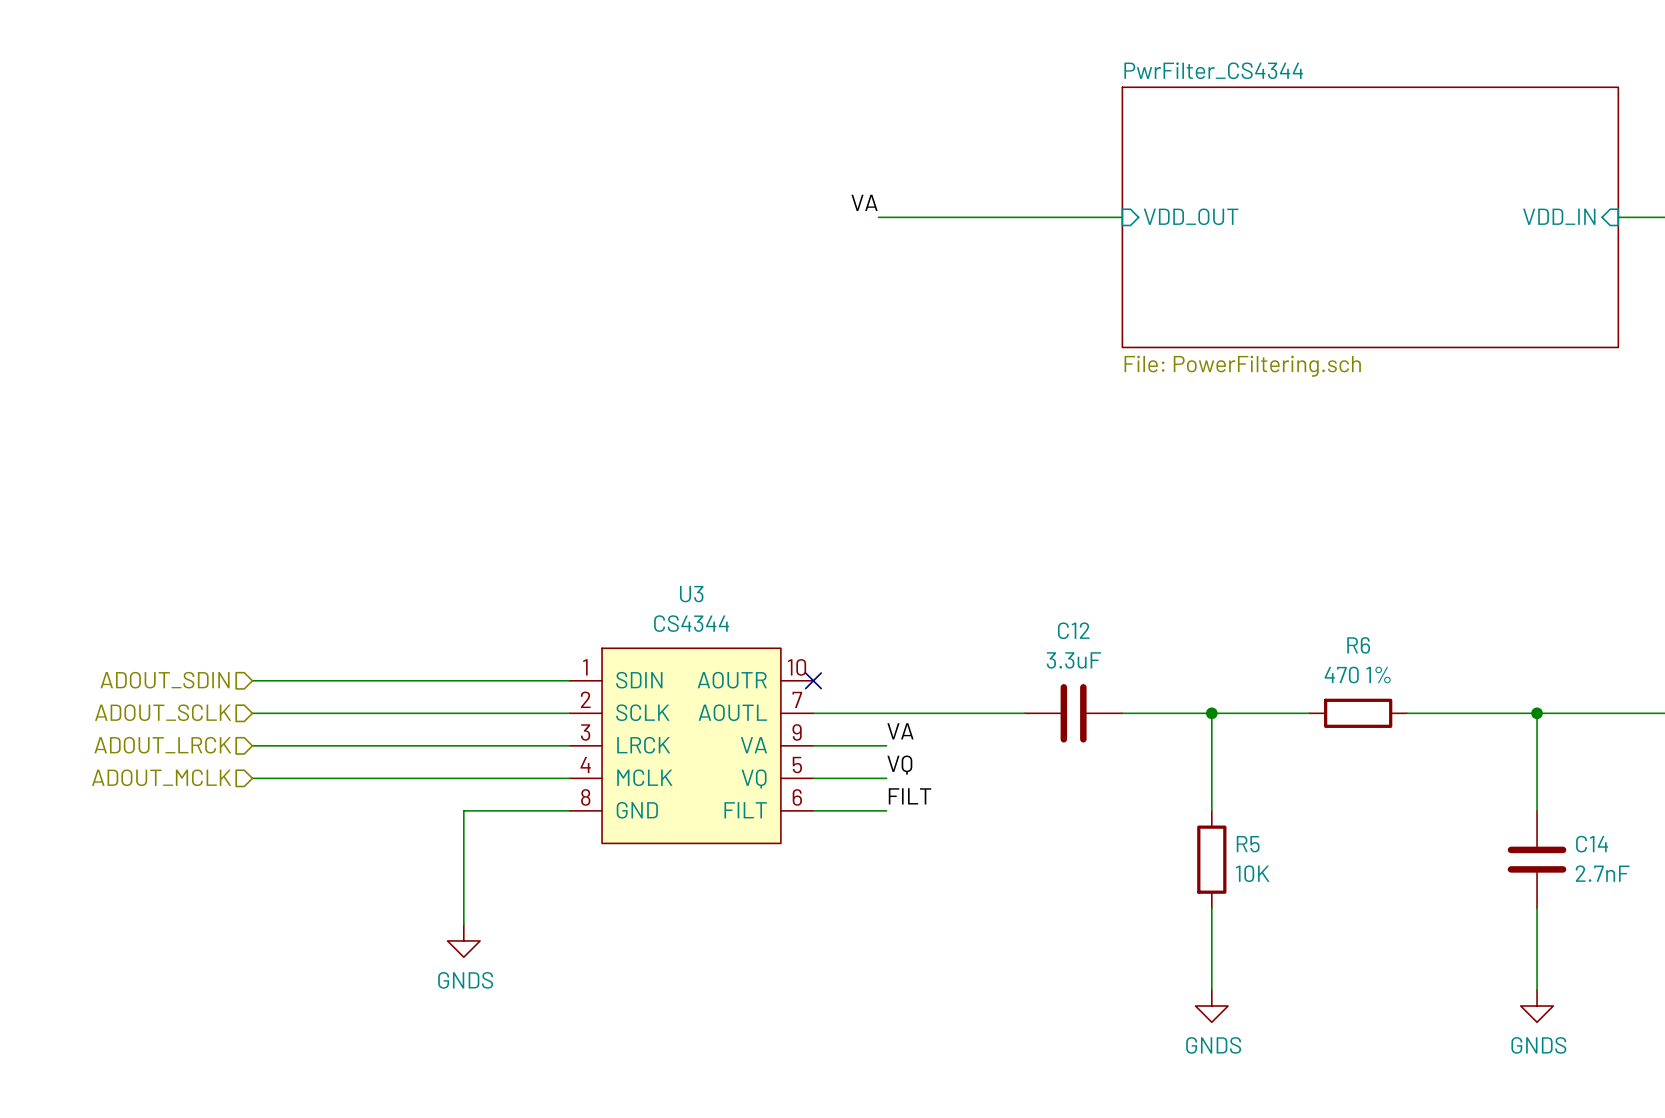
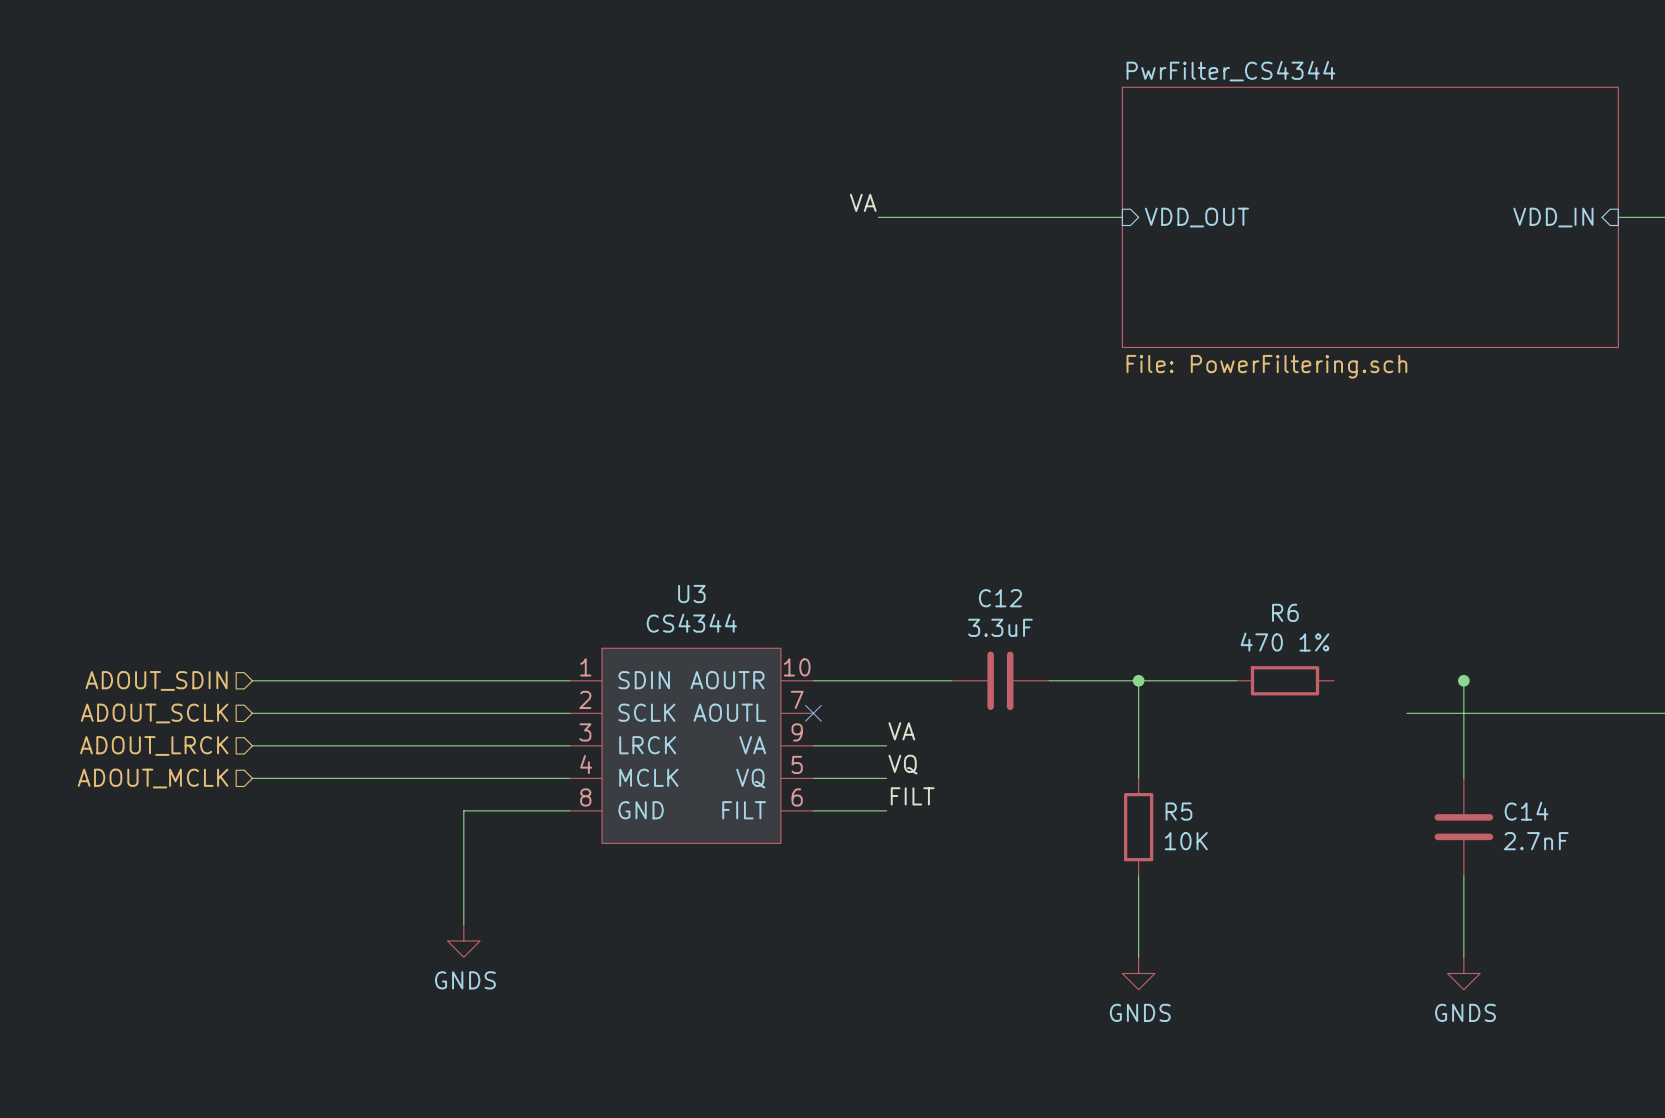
wire: none -> (813, 680) (951, 680)
no-connect mark position: (813, 680) -> (813, 713)
junction: none -> (1138, 680)
junction: none -> (1463, 680)
wire: (813, 713) (1024, 713) -> none
C12 position: (1073, 713) -> (1000, 680)
wire: (1122, 713) (1309, 713) -> (1049, 680) (1236, 680)
wire: (1211, 713) (1211, 810) -> (1138, 680) (1138, 778)
junction: (1211, 713) -> none
R6 position: (1358, 713) -> (1284, 680)
wire: (1537, 713) (1537, 810) -> (1463, 680) (1463, 778)
junction: (1537, 713) -> none
R5 position: (1211, 859) -> (1138, 827)
C14 position: (1537, 859) -> (1463, 827)
wire: (1211, 908) (1211, 989) -> (1138, 875) (1138, 957)
wire: (1537, 908) (1537, 989) -> (1463, 875) (1463, 957)
power symbol position: GNDS (1211, 1006) -> GNDS (1138, 973)
power symbol position: GNDS (1537, 1006) -> GNDS (1463, 973)

